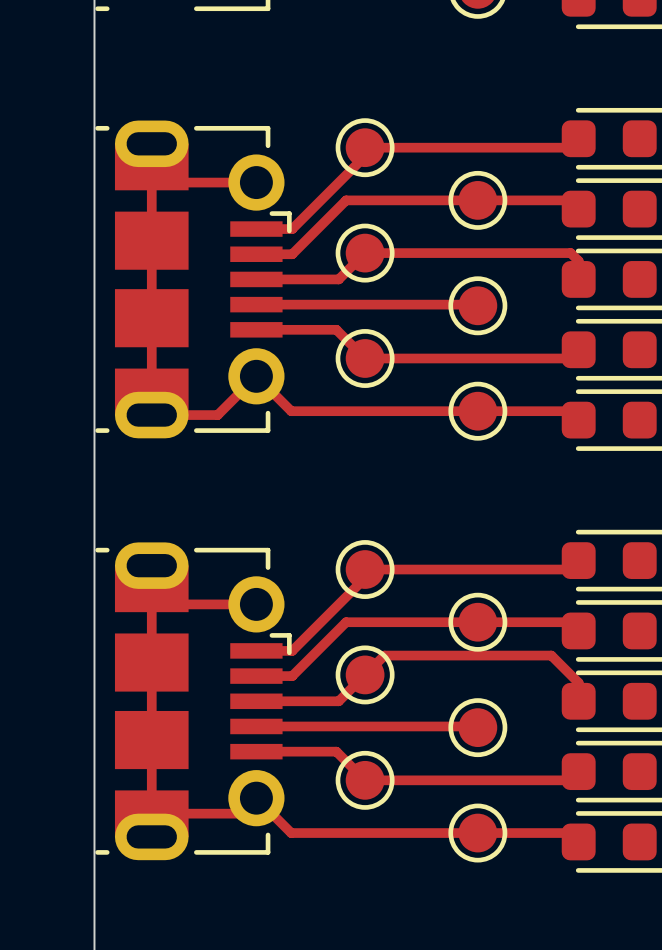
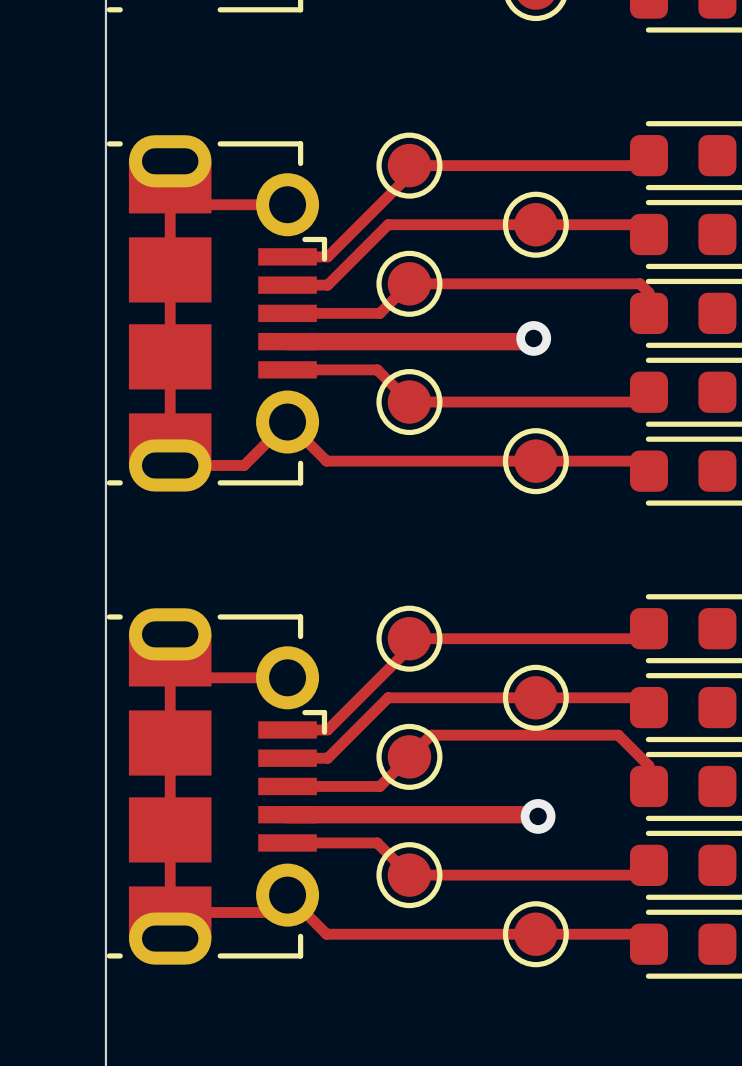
via: none -> (533, 338)
track width: thin (256, 304) (473, 304) -> thick (287, 341) (530, 341)
part: (477, 305) -> none
track width: thin (256, 726) (476, 726) -> thick (287, 814) (534, 814)
part: (477, 727) -> none
via: none -> (538, 816)

